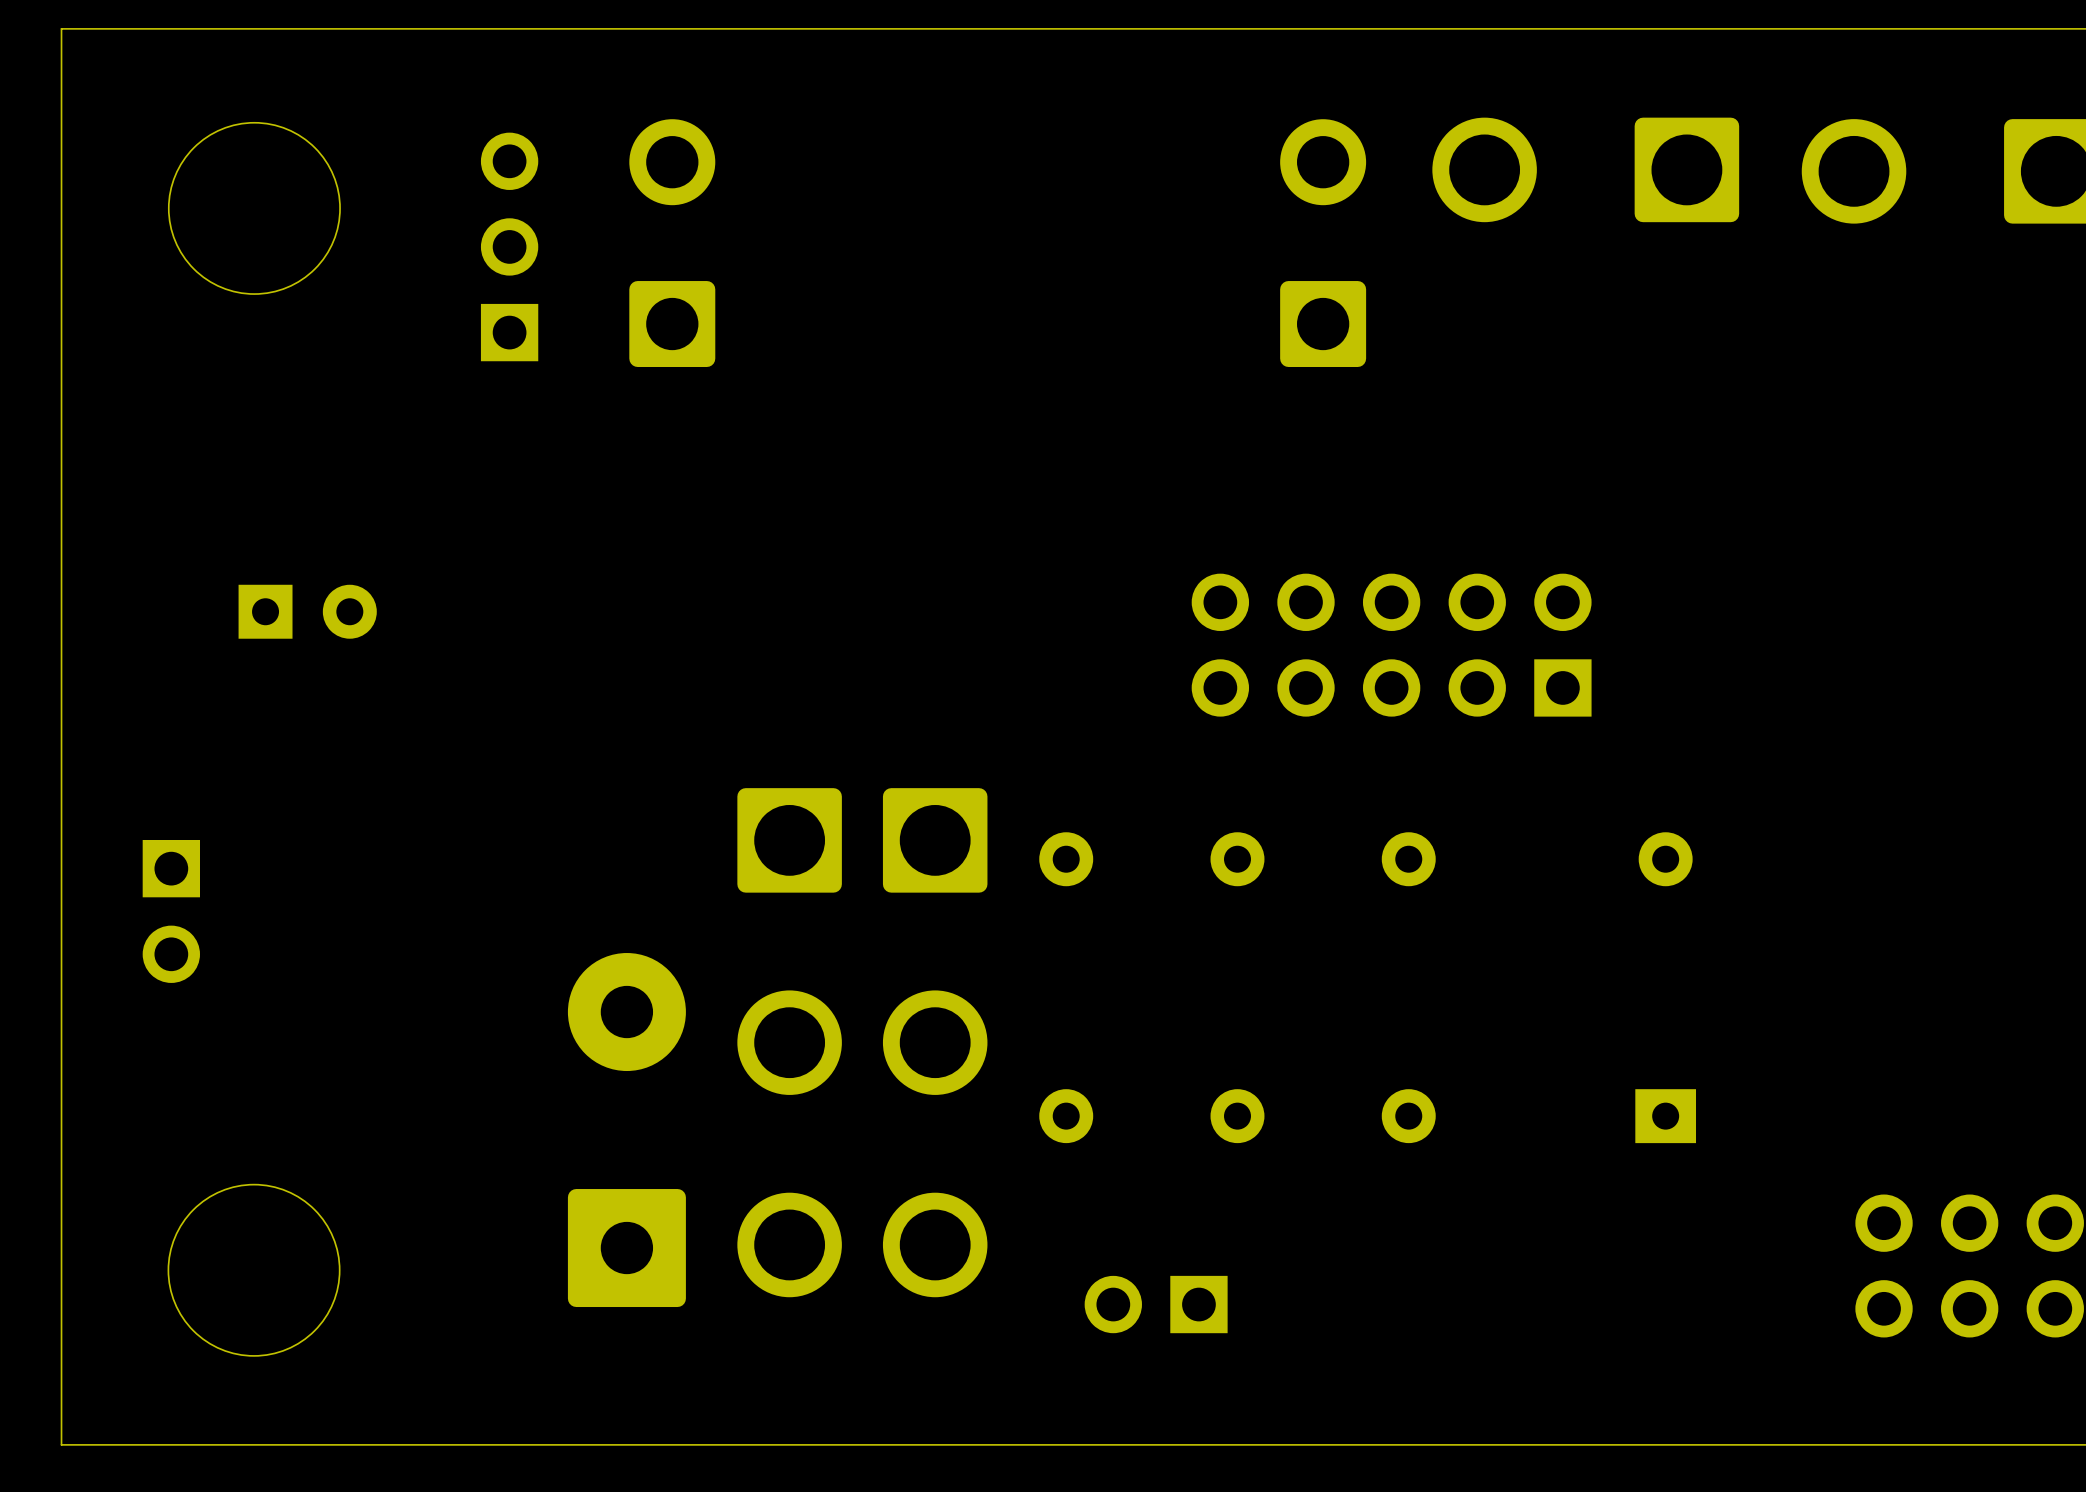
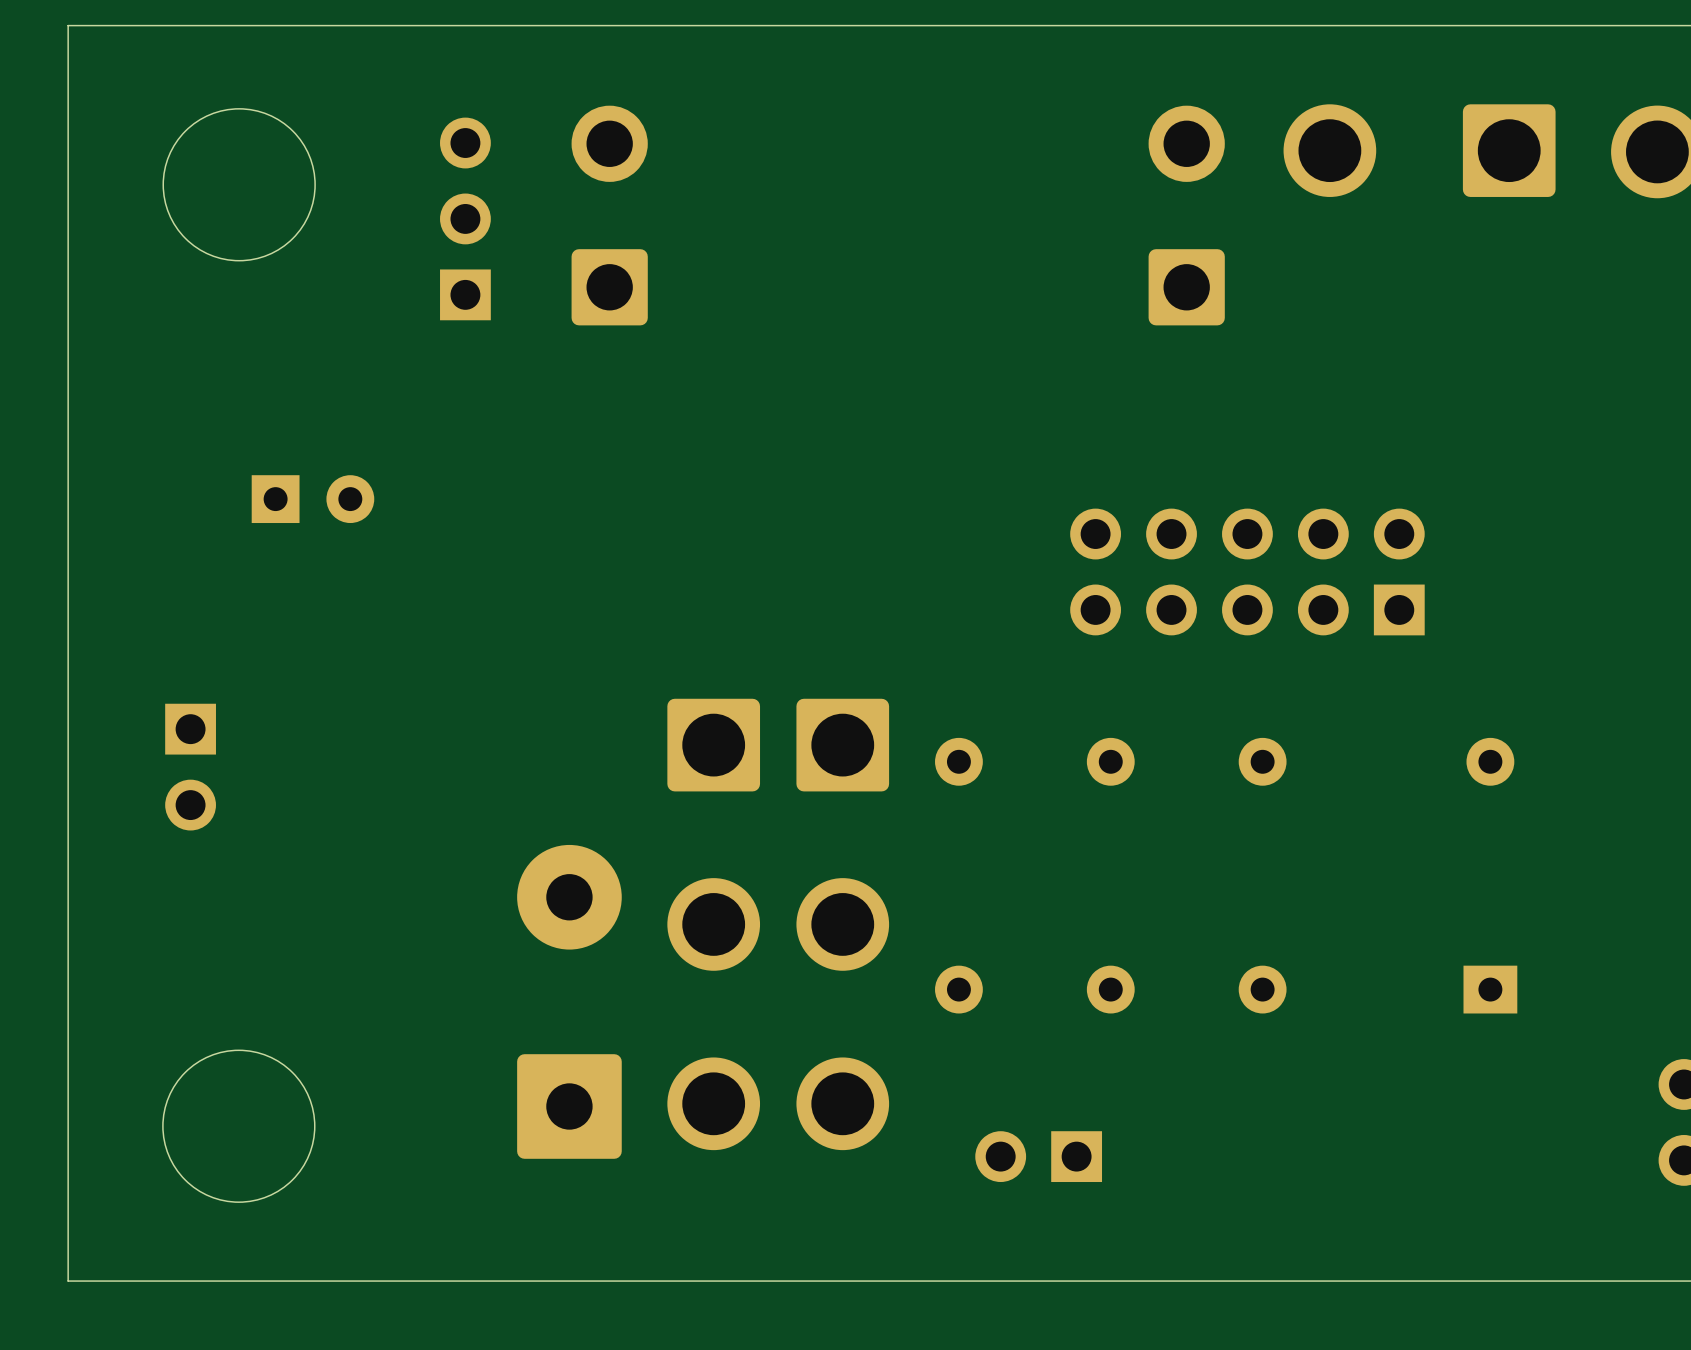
part position: (307, 611) -> (312, 499)
part position: (171, 911) -> (190, 767)

